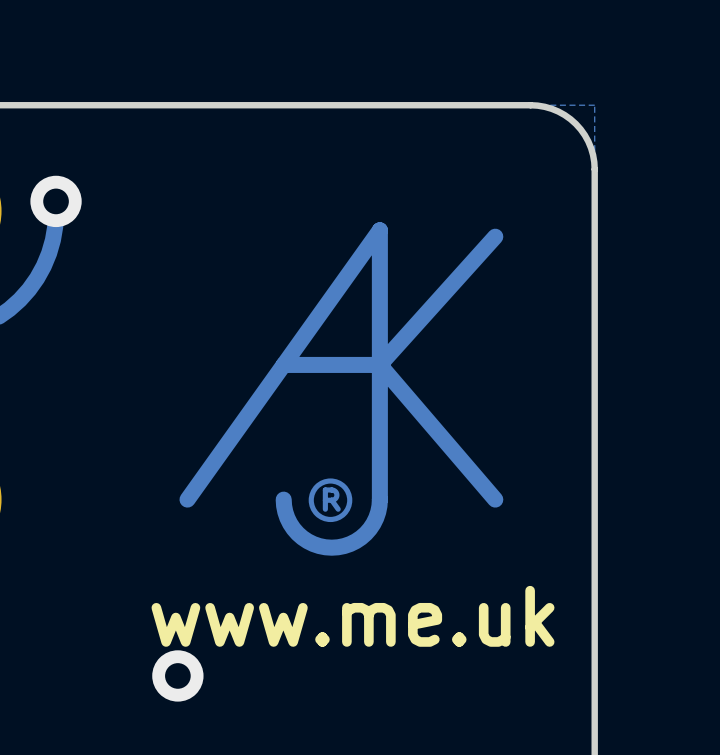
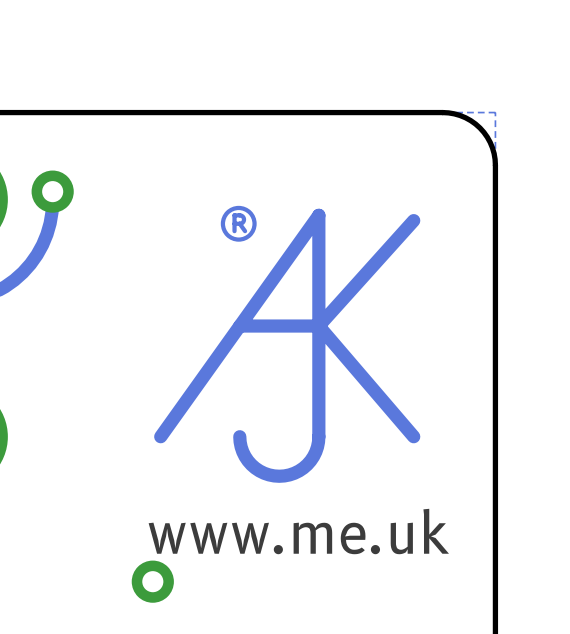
drawing shape: [179, 222, 504, 556] -> [154, 205, 421, 483]

